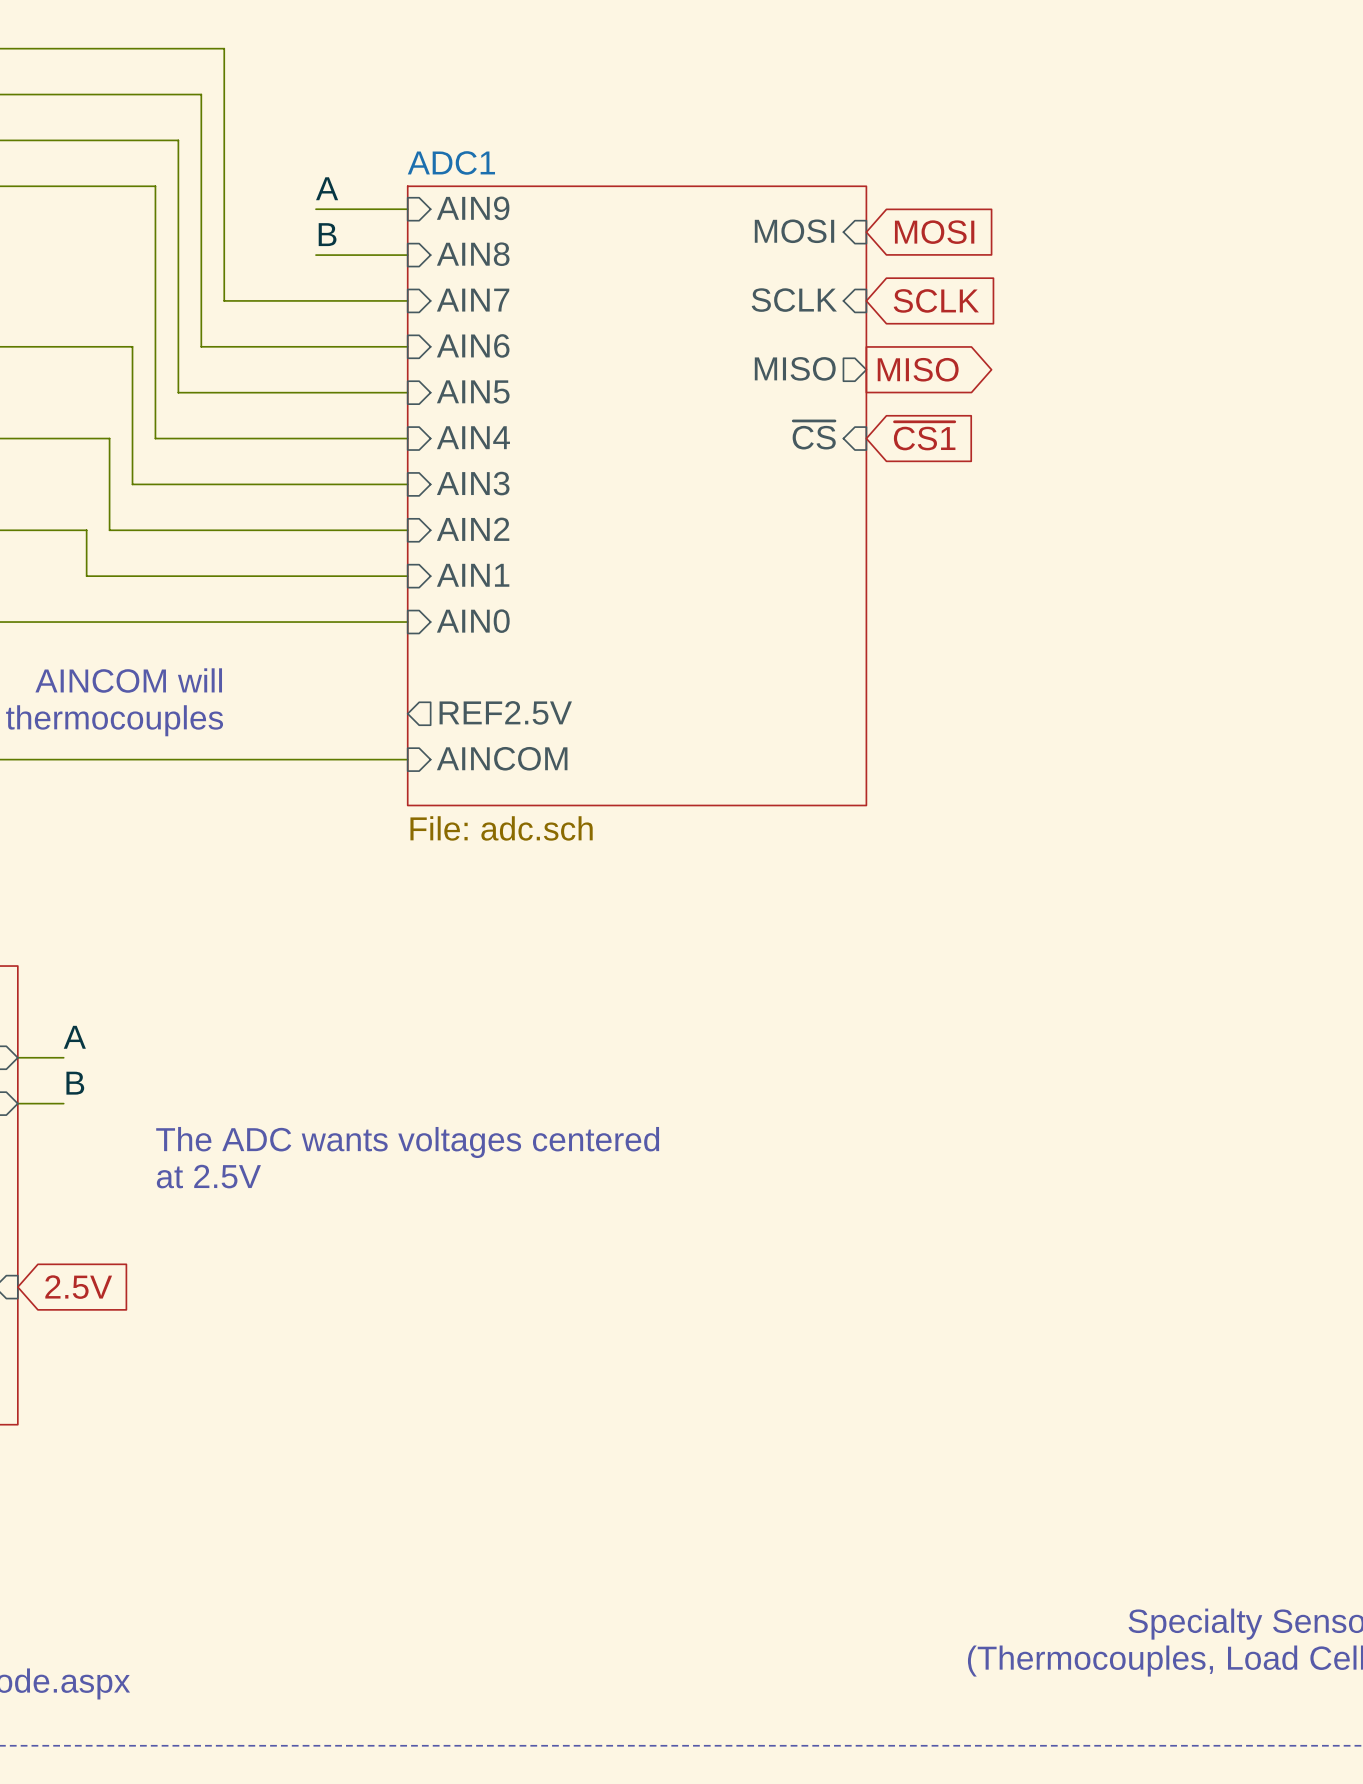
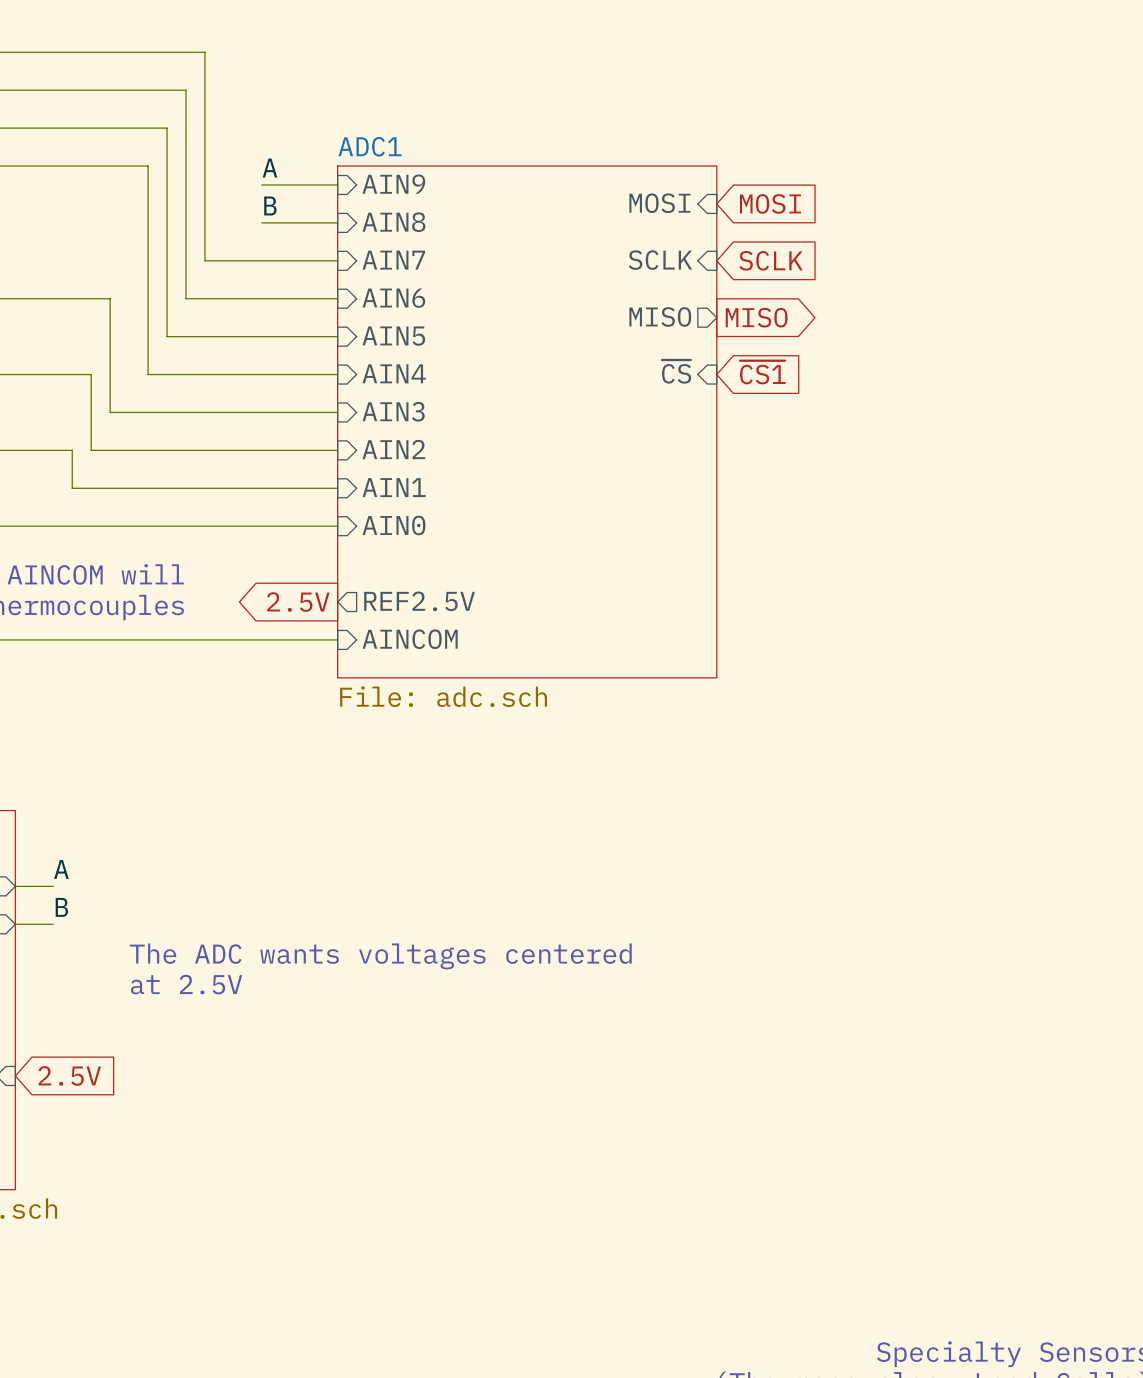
wire: (224, 48) (224, 94) -> (167, 90) (186, 90)
wire: none -> (186, 52) (204, 52) (204, 260)
wire: (201, 94) (201, 140) -> (148, 128) (167, 128)
wire: (178, 140) (178, 186) -> (129, 166) (148, 166)
wire: (155, 186) (155, 438) (178, 438) -> none
wire: (224, 300) (247, 300) -> (186, 260) (186, 298)
wire: (201, 346) (224, 346) -> (167, 298) (167, 336)
wire: (178, 392) (201, 392) -> (148, 336) (148, 374)
global label: none -> 2.5V (298, 602)

